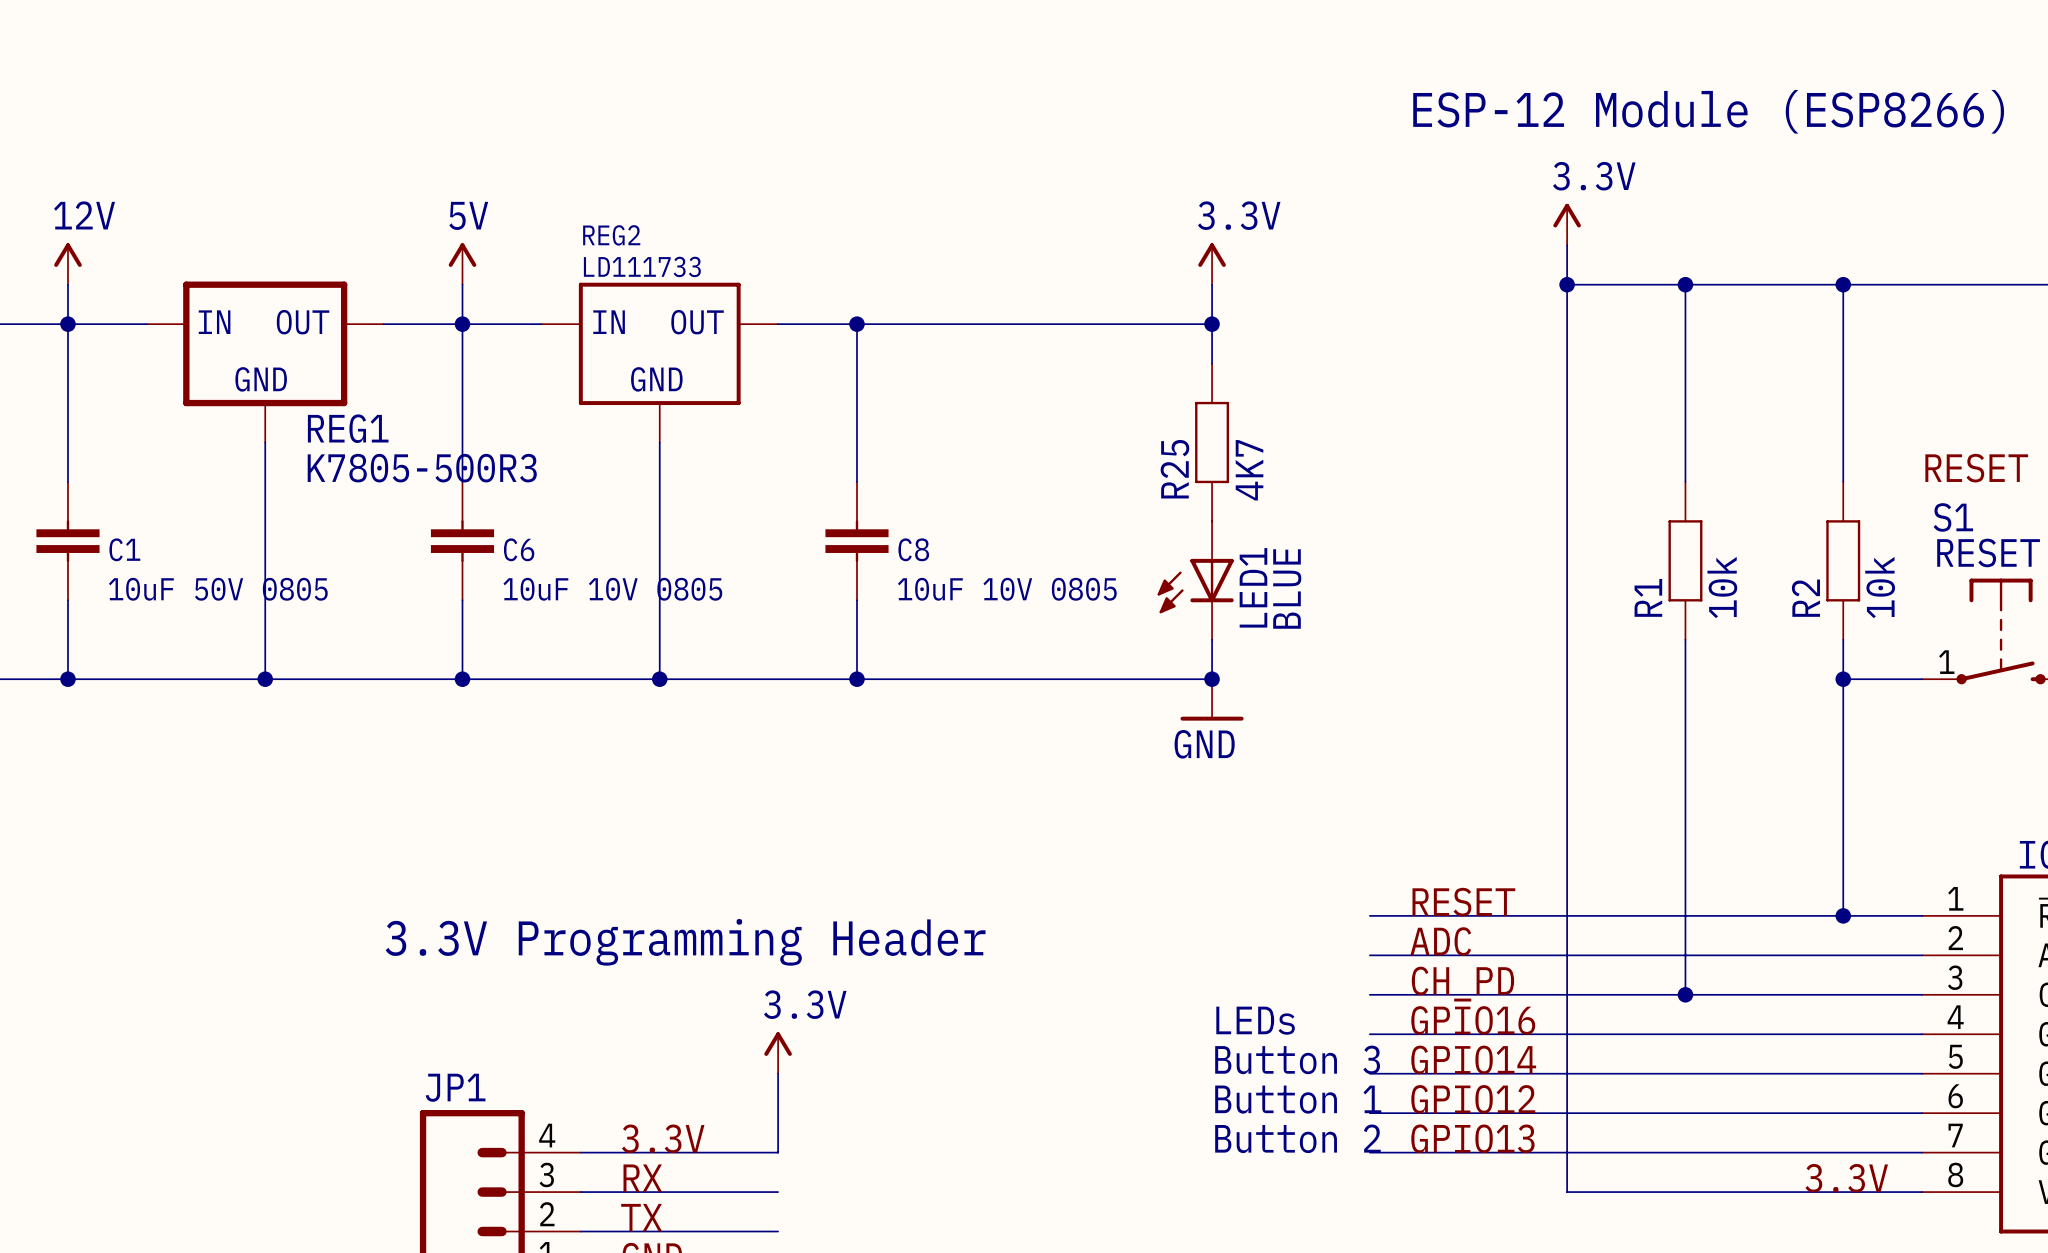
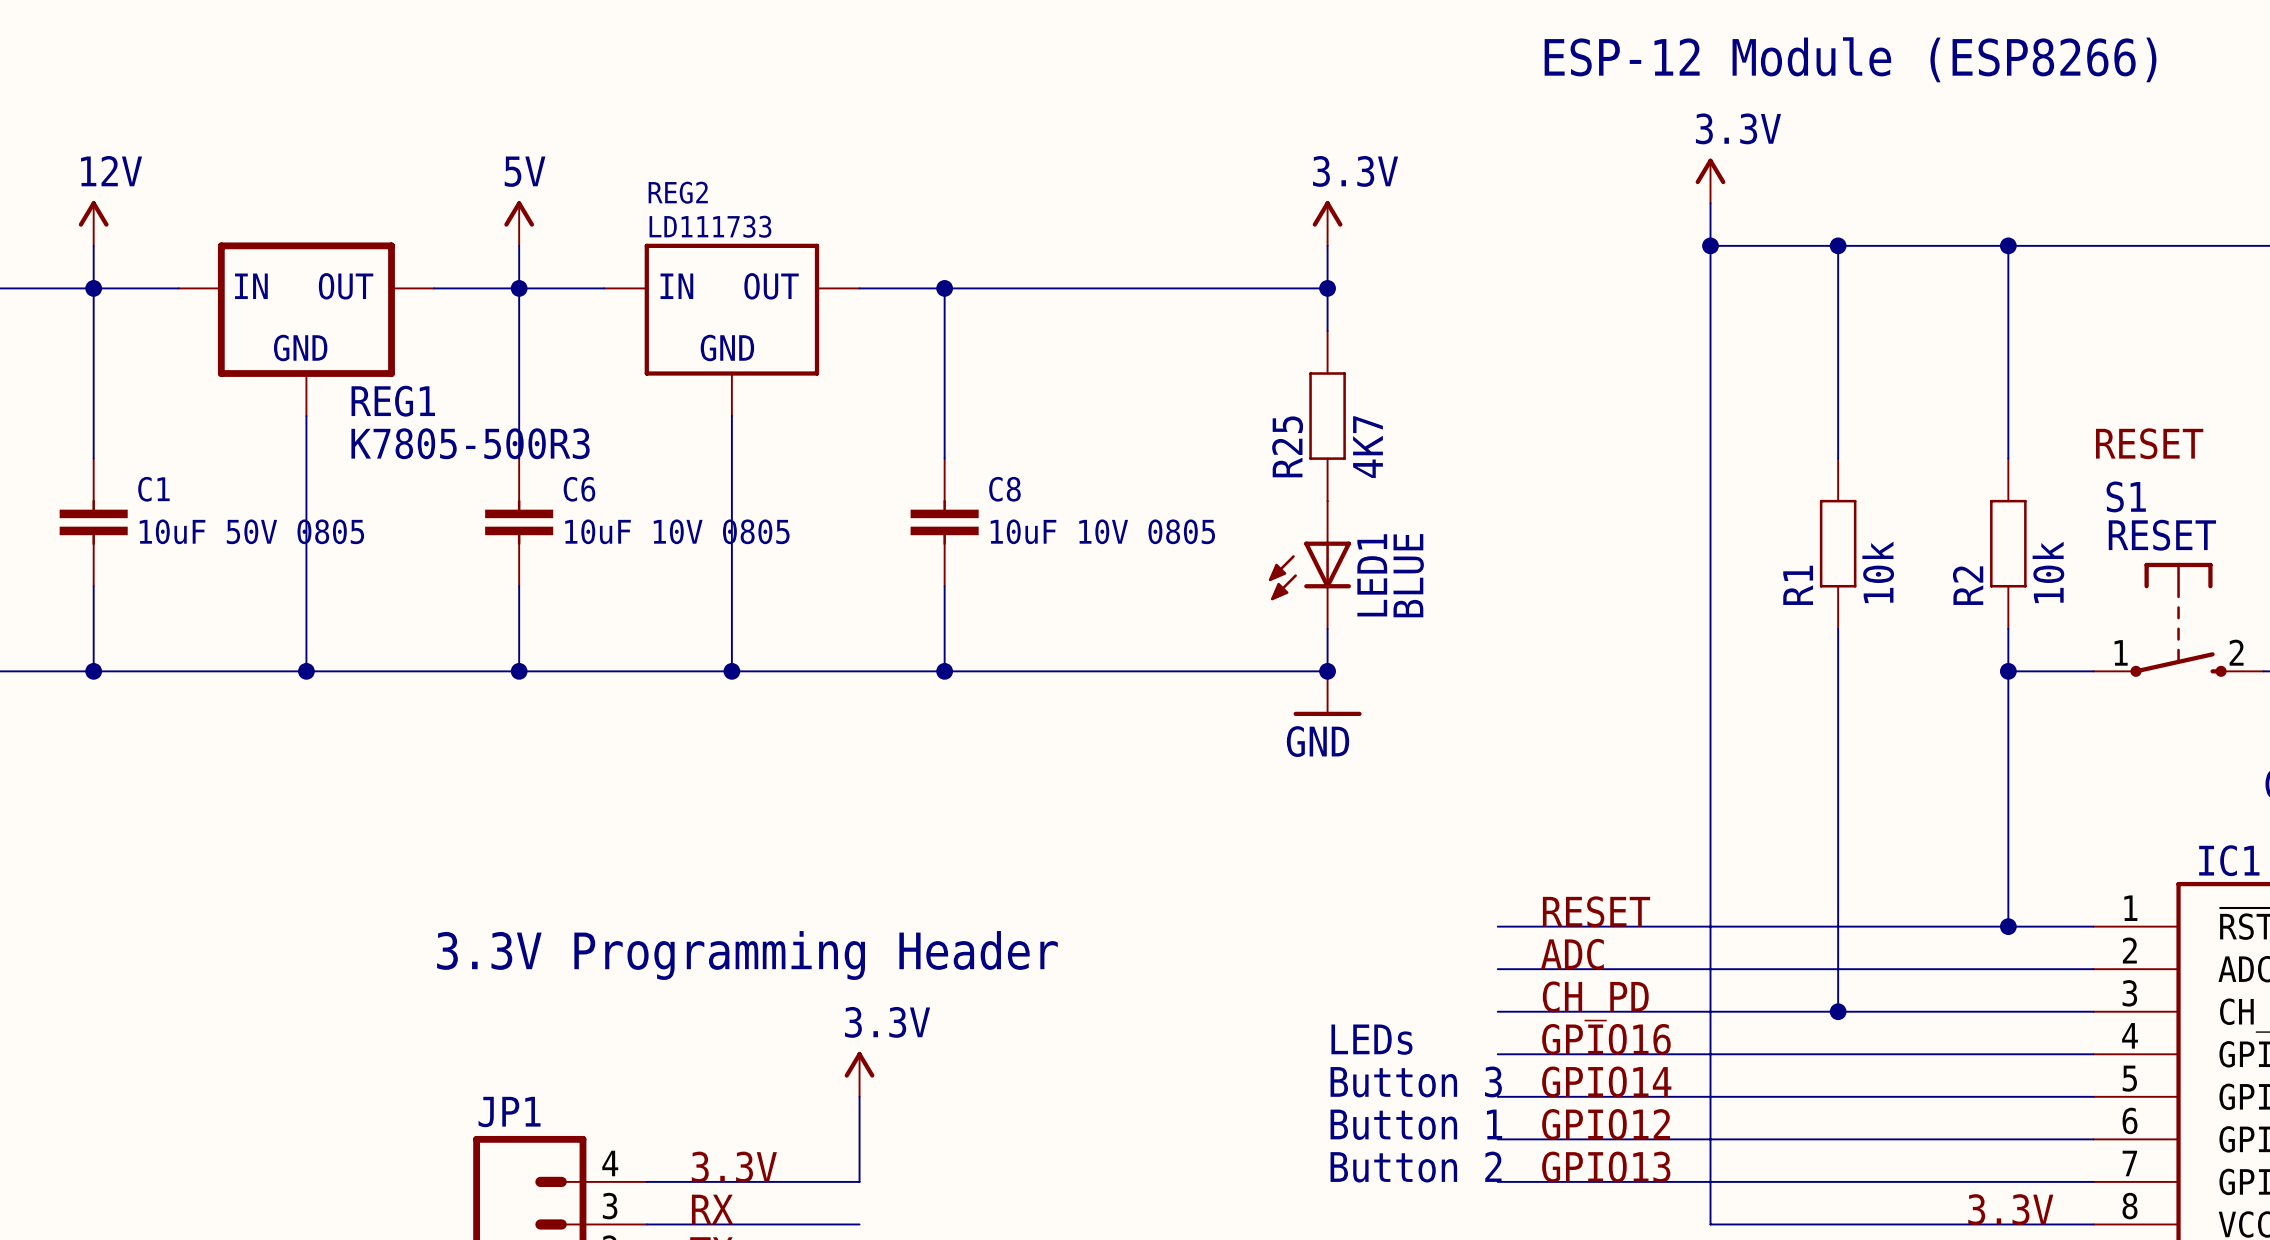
C1 name position: C1 (124, 549) -> C1 (153, 489)
C6 name position: C6 (519, 549) -> C6 (579, 489)
C8 name position: C8 (913, 549) -> C8 (1004, 489)
C1 value position: 10uF 50V 0805 (218, 589) -> 10uF 50V 0805 (251, 531)
C6 value position: 10uF 10V 0805 (612, 589) -> 10uF 10V 0805 (677, 531)
C8 value position: 10uF 10V 0805 (1007, 589) -> 10uF 10V 0805 (1102, 531)

